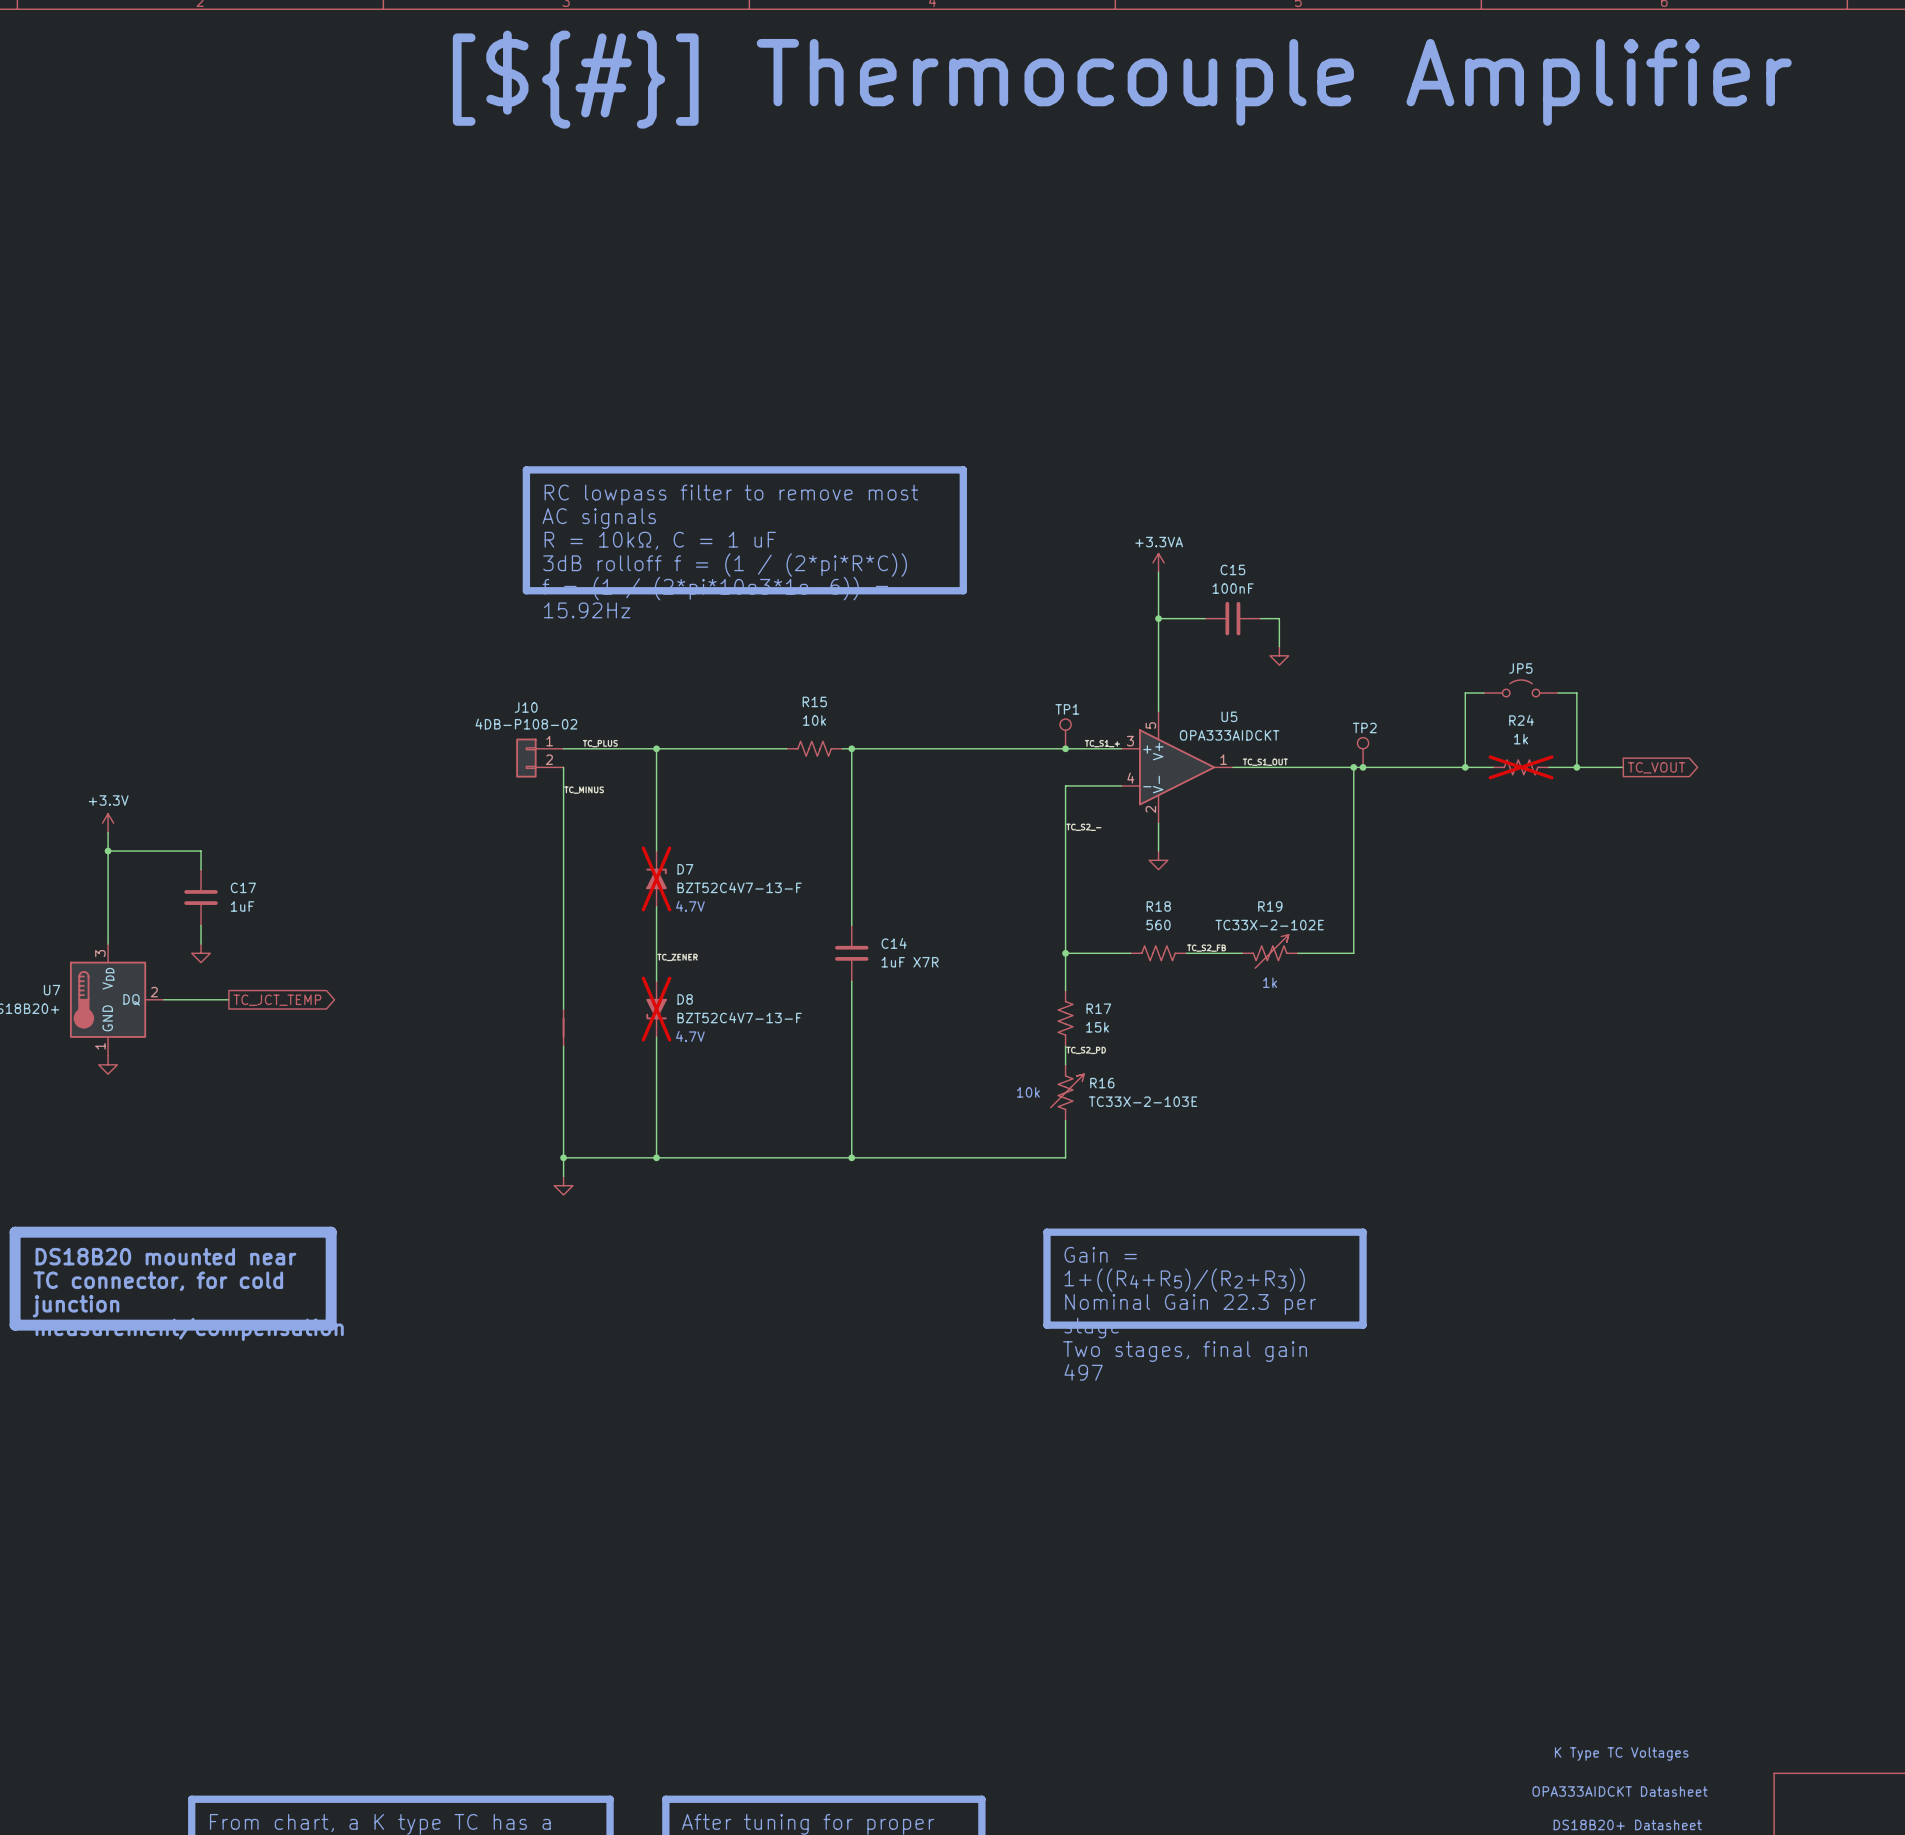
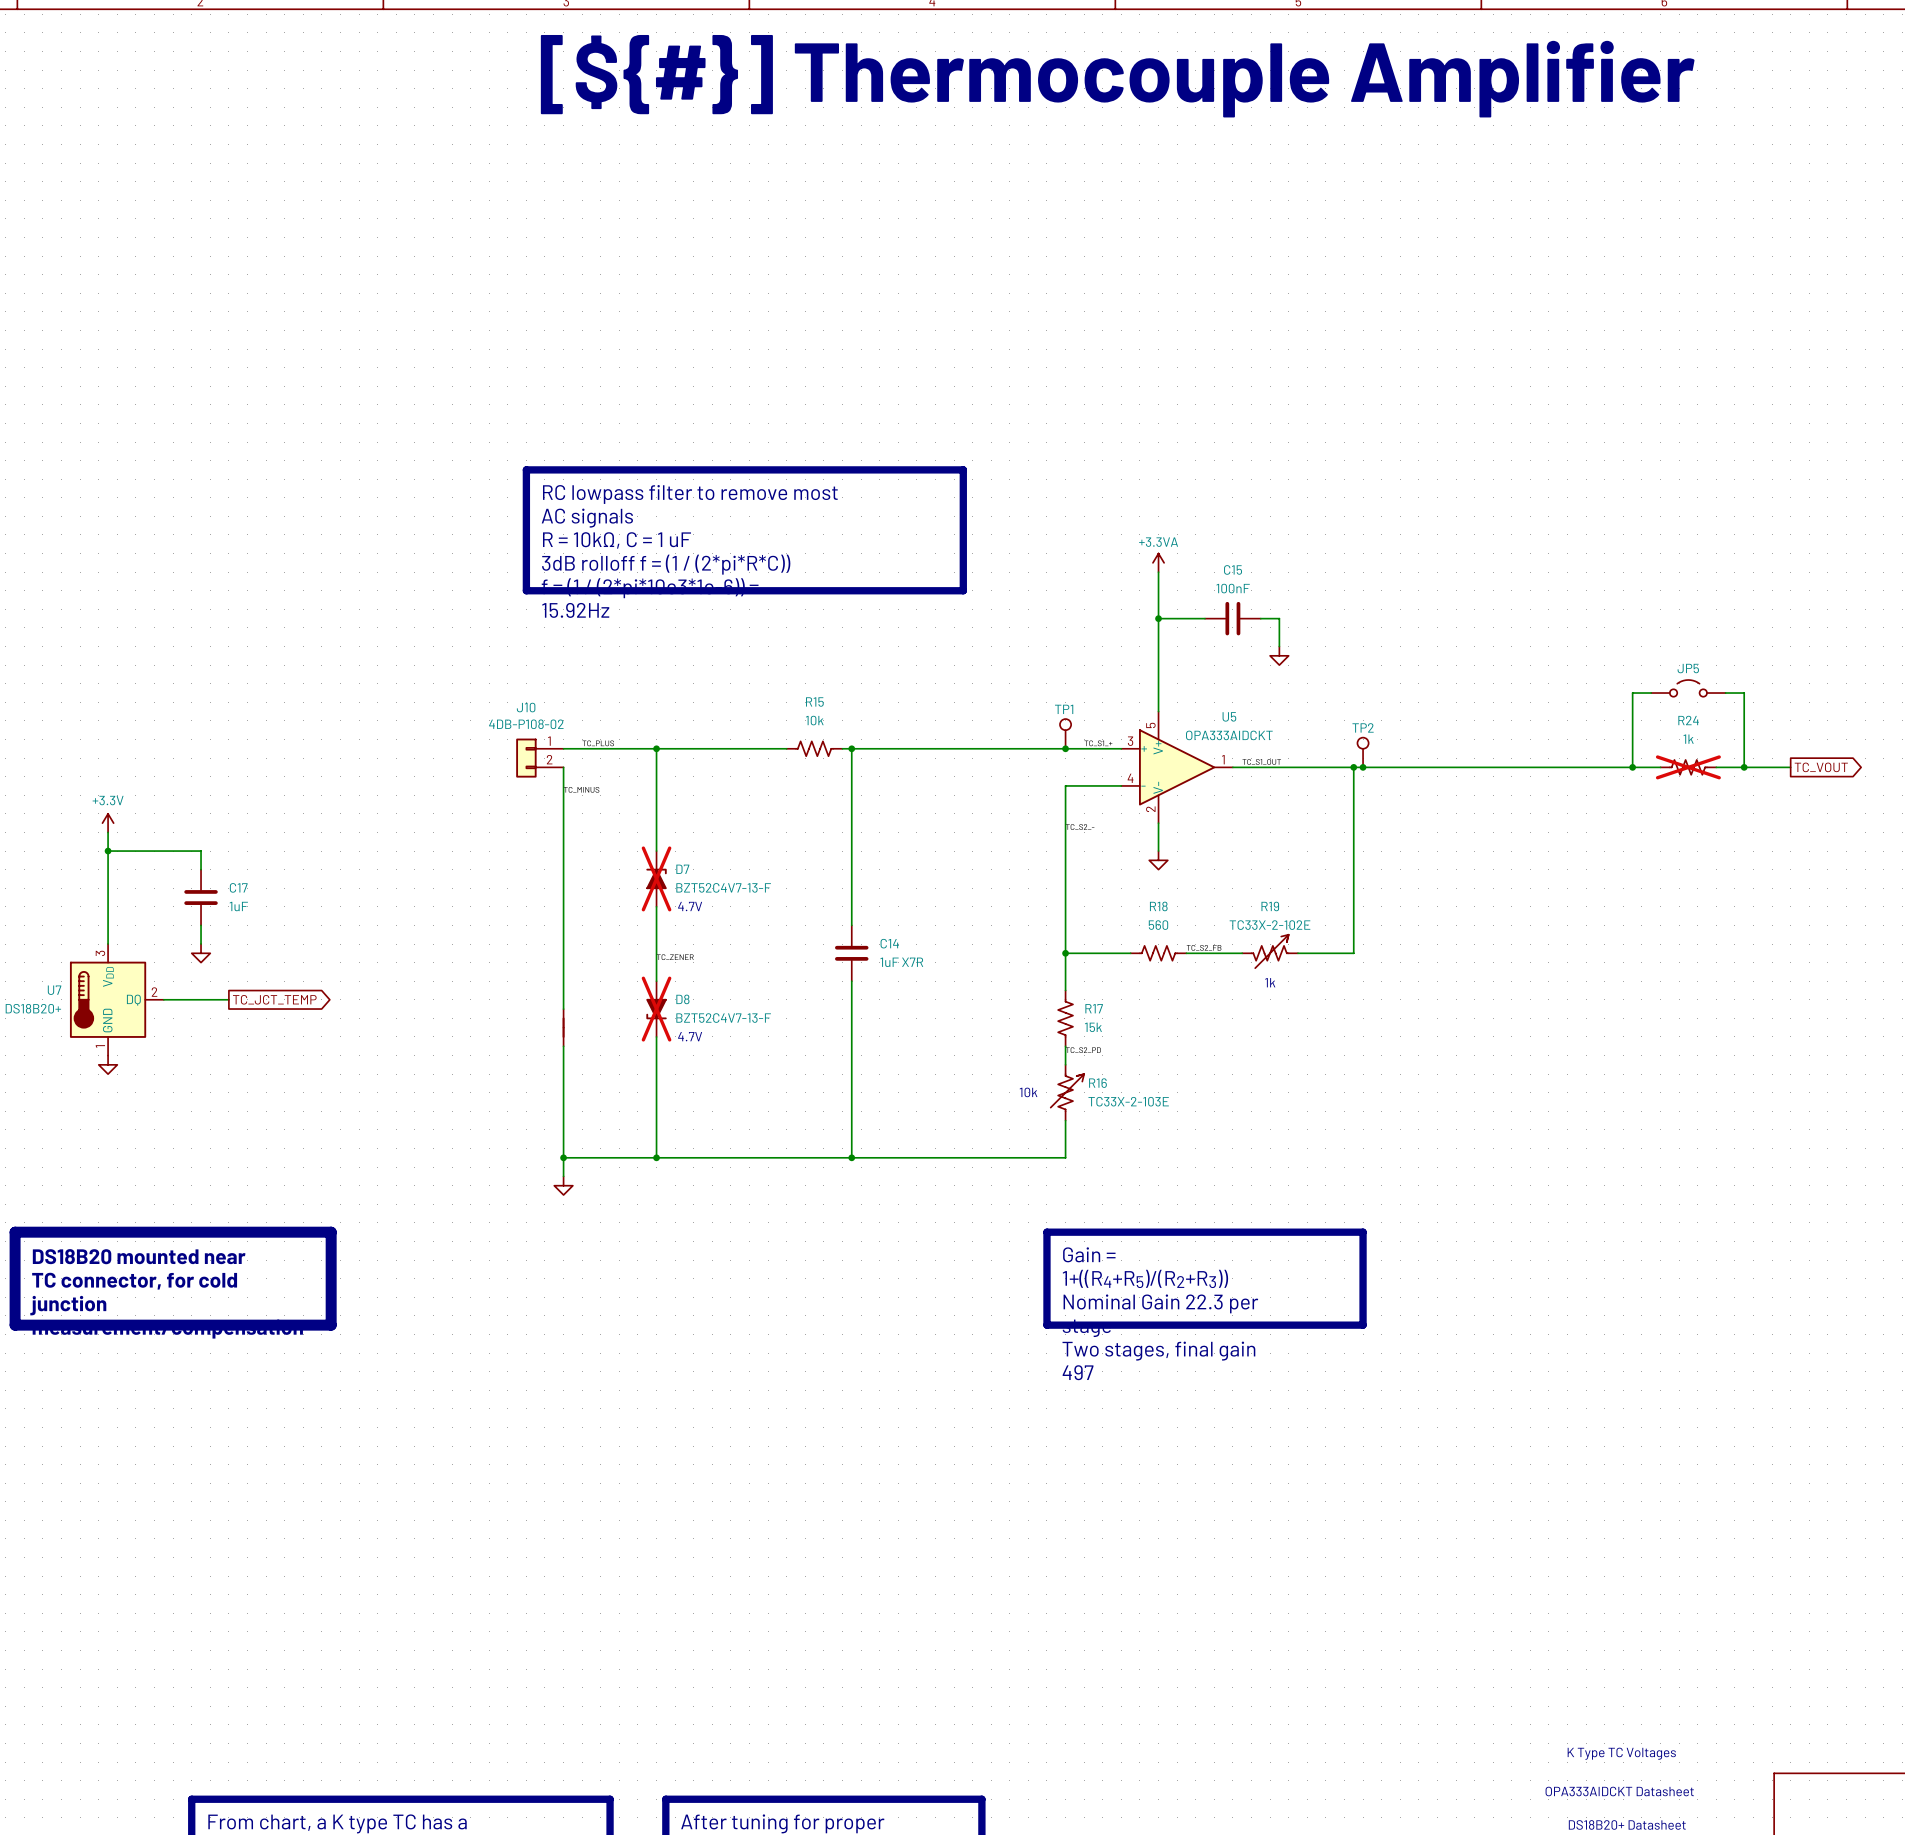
JP5 position: (1521, 688) -> (1688, 688)
wire: (1483, 693) (1465, 693) (1465, 767) -> (1651, 693) (1632, 693) (1632, 767)
wire: (1558, 693) (1576, 693) (1576, 767) -> (1725, 693) (1744, 693) (1744, 767)
junction: (1465, 767) -> none
R24 position: (1521, 767) -> (1688, 767)
junction: (1576, 767) -> none
wire: none -> (1623, 767) (1660, 767)
junction: none -> (1632, 767)
global label position: TC_VOUT (1656, 767) -> TC_VOUT (1821, 767)
wire: none -> (1716, 767) (1790, 767)
junction: none -> (1744, 767)

